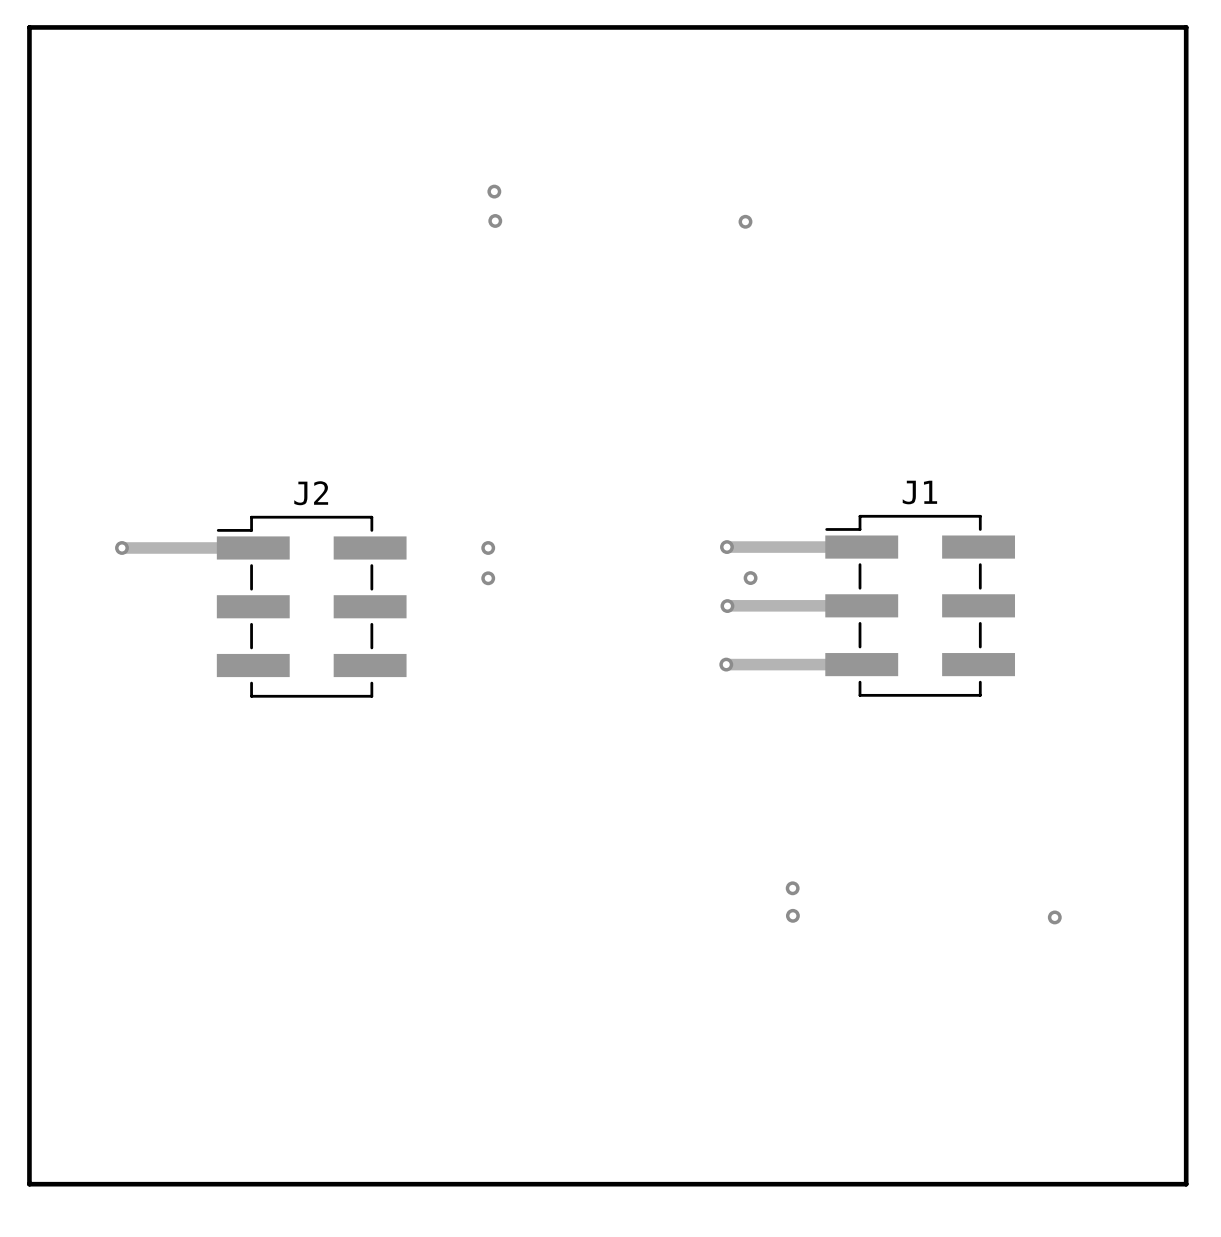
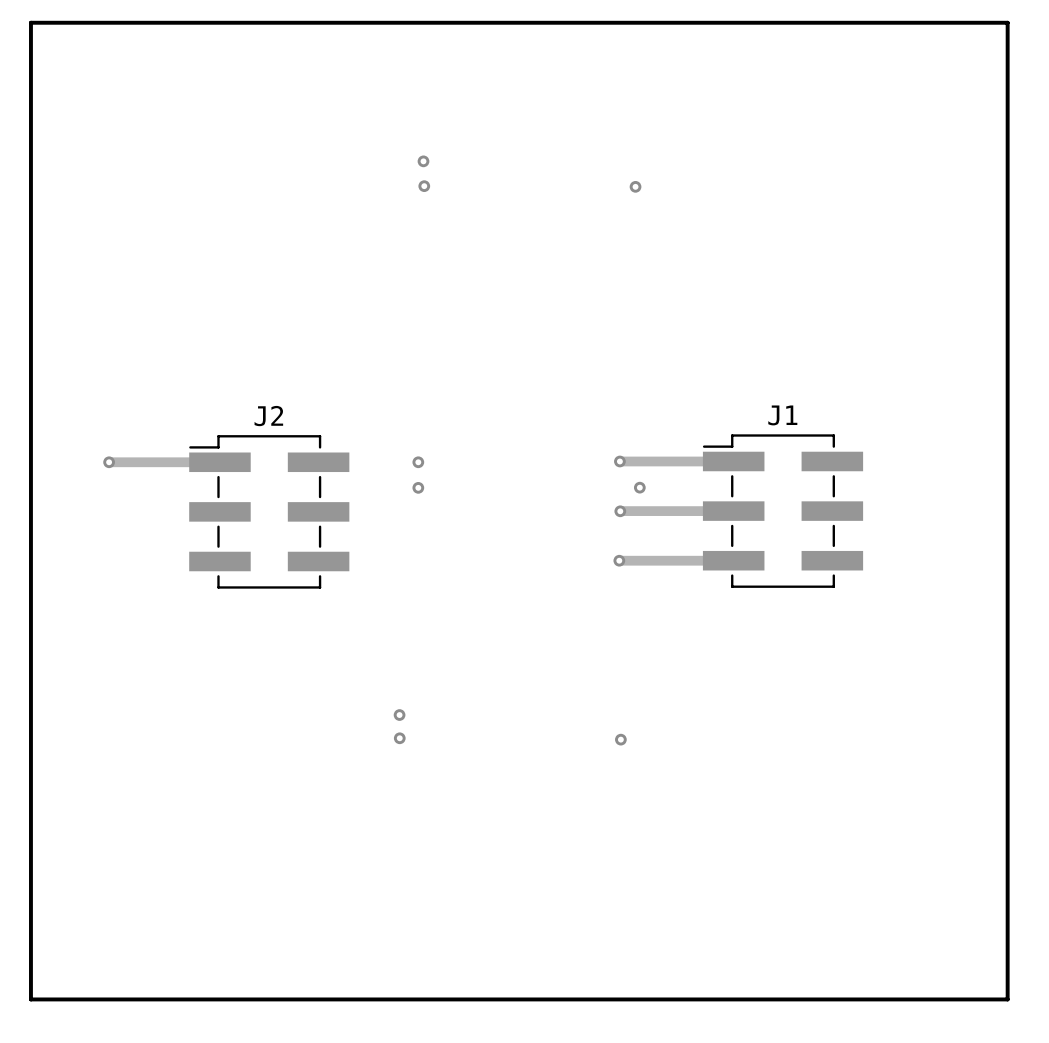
via: none -> (399, 715)
via: none -> (399, 738)
via: none -> (620, 739)
via: (792, 888) -> none
via: (792, 915) -> none
via: (1054, 917) -> none

